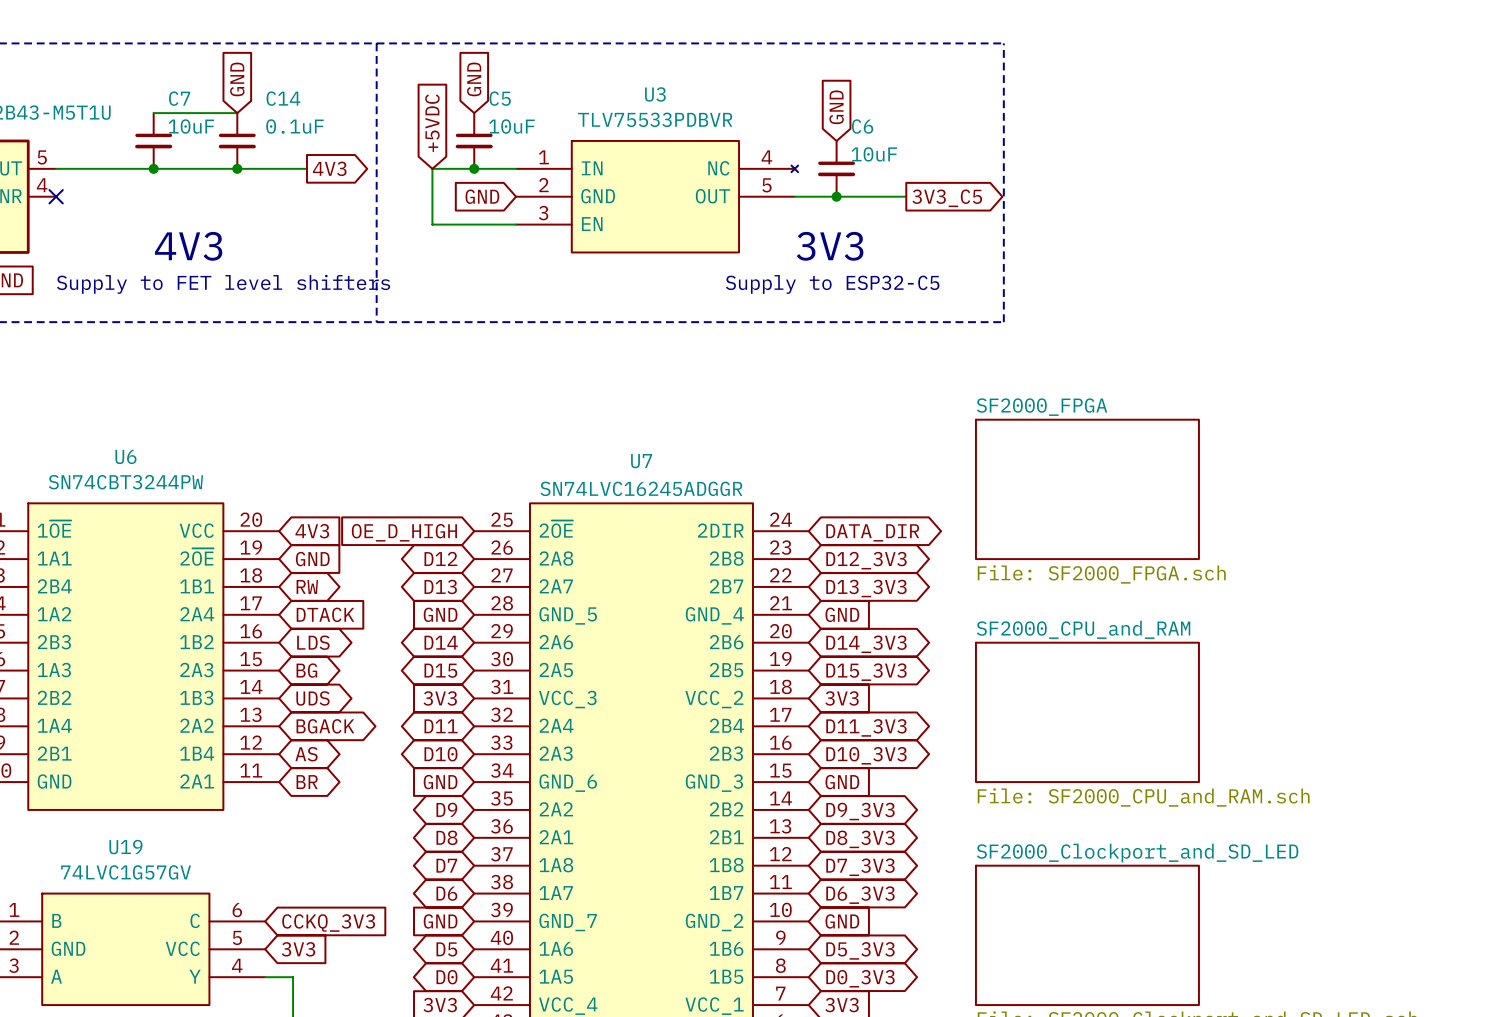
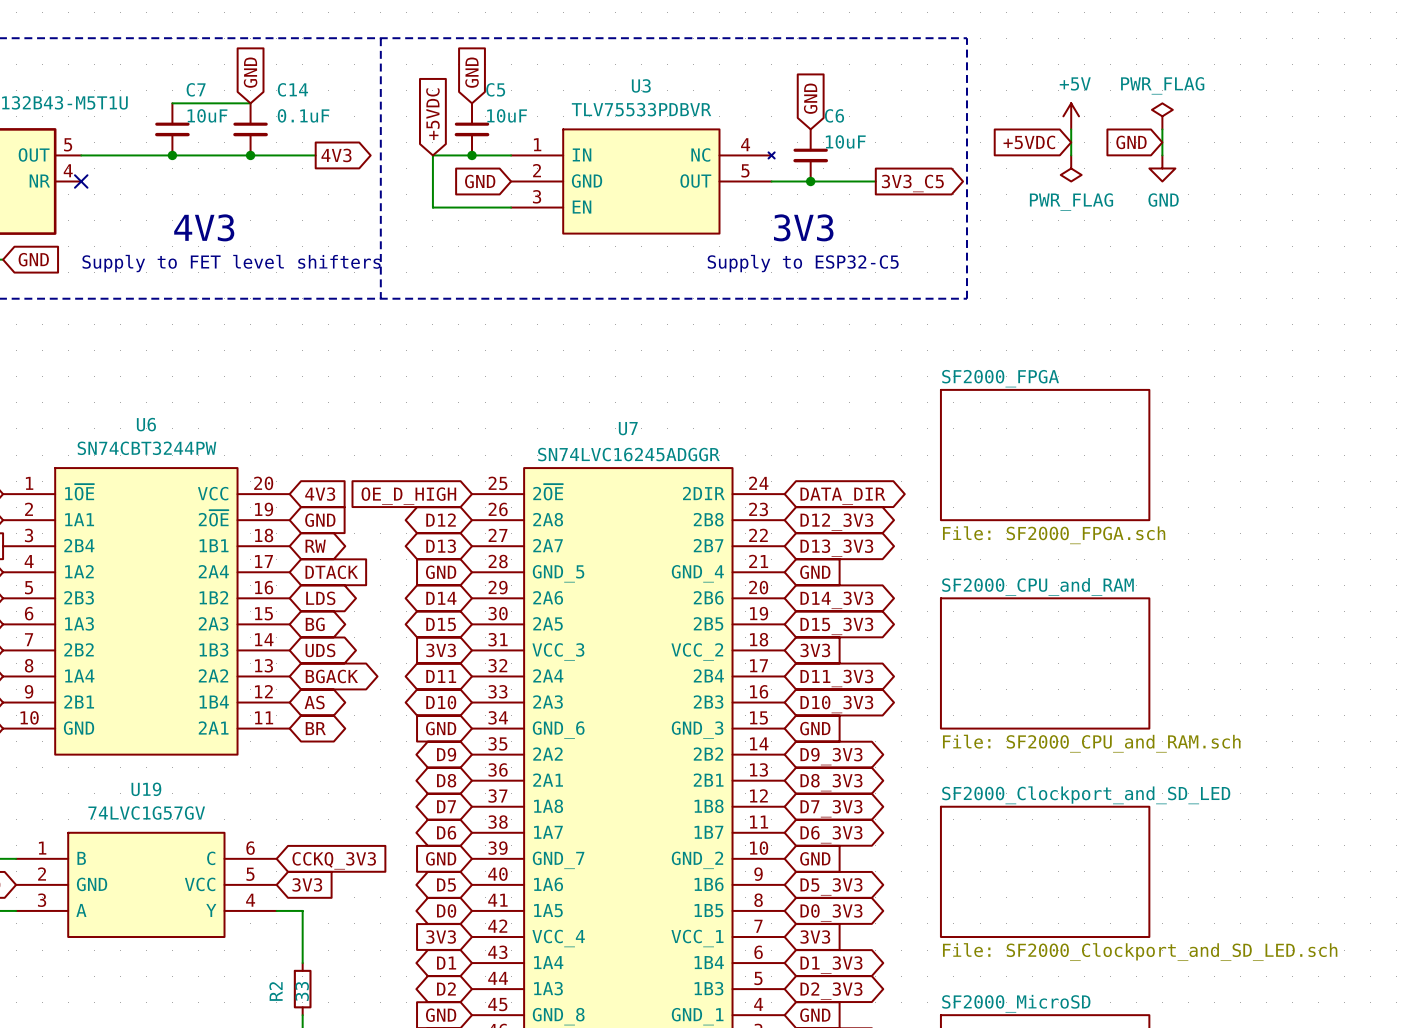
power symbol: none -> +5V (1071, 116)
power symbol: none -> PWR_FLAG (1162, 116)
wire: none -> (1071, 129) (1071, 155)
wire: none -> (1162, 129) (1162, 155)
global label: none -> +5VDC (1029, 142)
global label: none -> GND (1131, 142)
power symbol: none -> PWR_FLAG (1071, 168)
power symbol: none -> GND (1162, 168)

